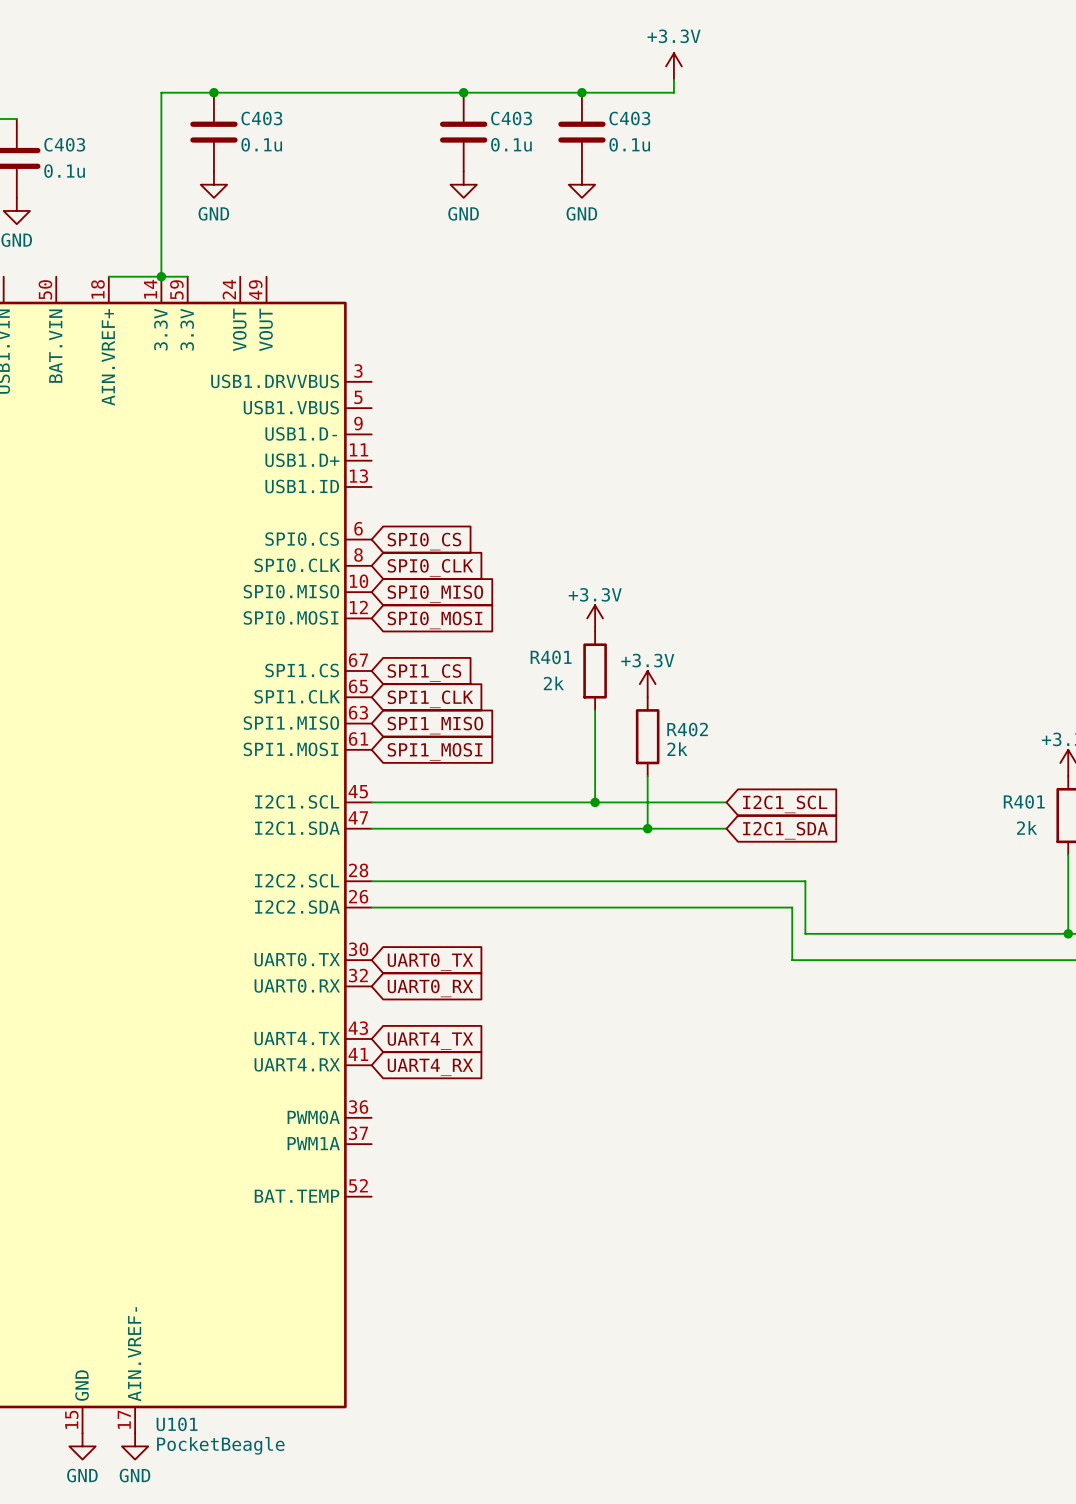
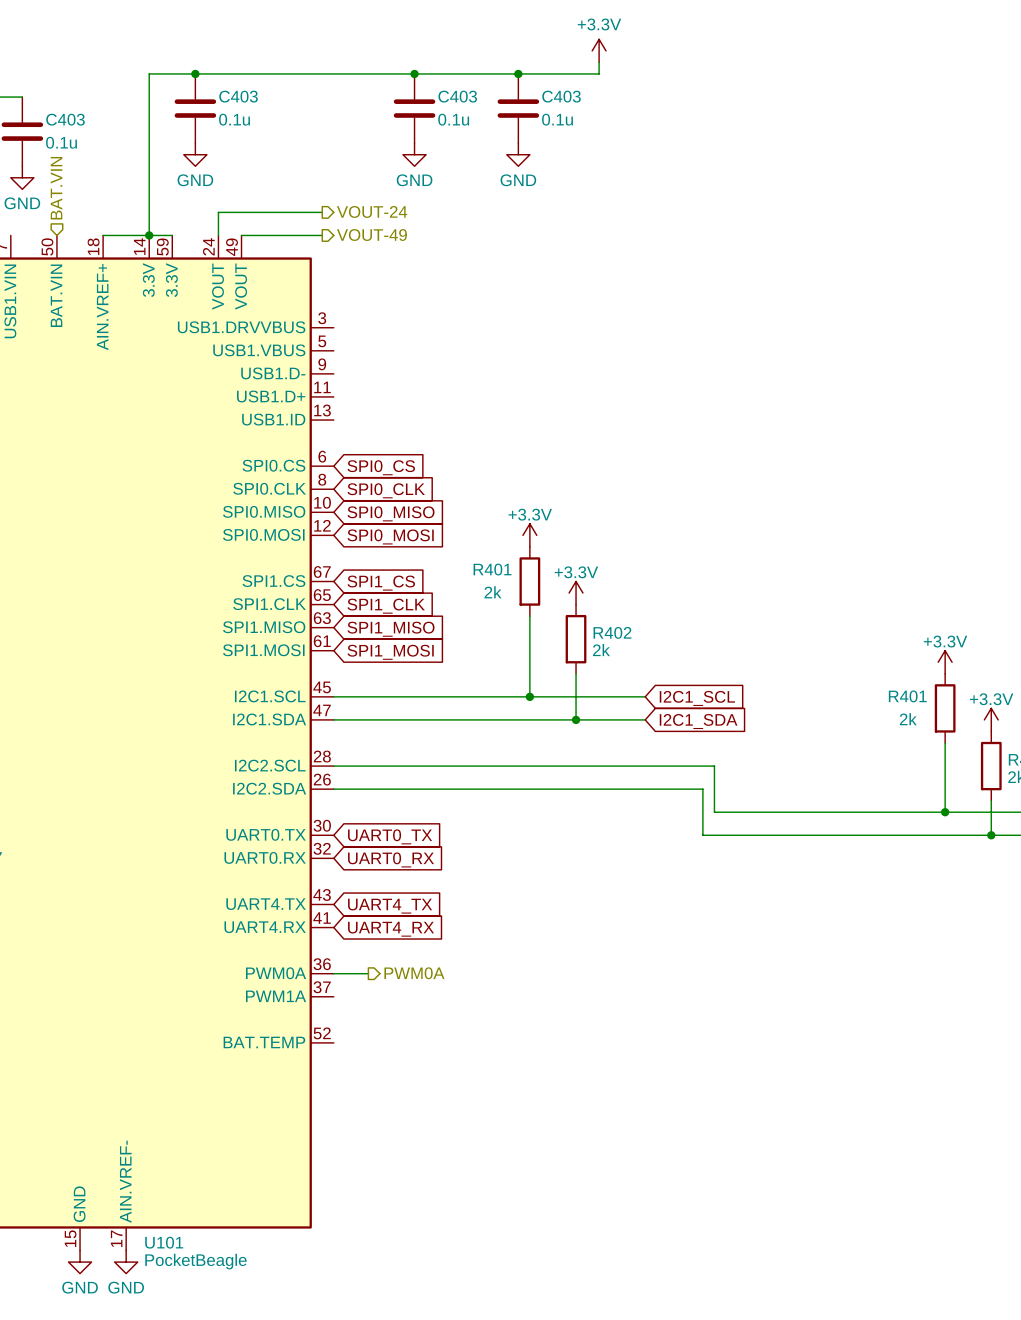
hierarchical label: none -> BAT.VIN (56, 188)
hierarchical label: none -> VOUT-24 (372, 211)
wire: none -> (322, 212) (218, 212) (218, 235)
wire: none -> (241, 235) (322, 235)
hierarchical label: none -> VOUT-49 (371, 235)
wire: none -> (333, 973) (368, 973)
hierarchical label: none -> PWM0A (414, 973)

